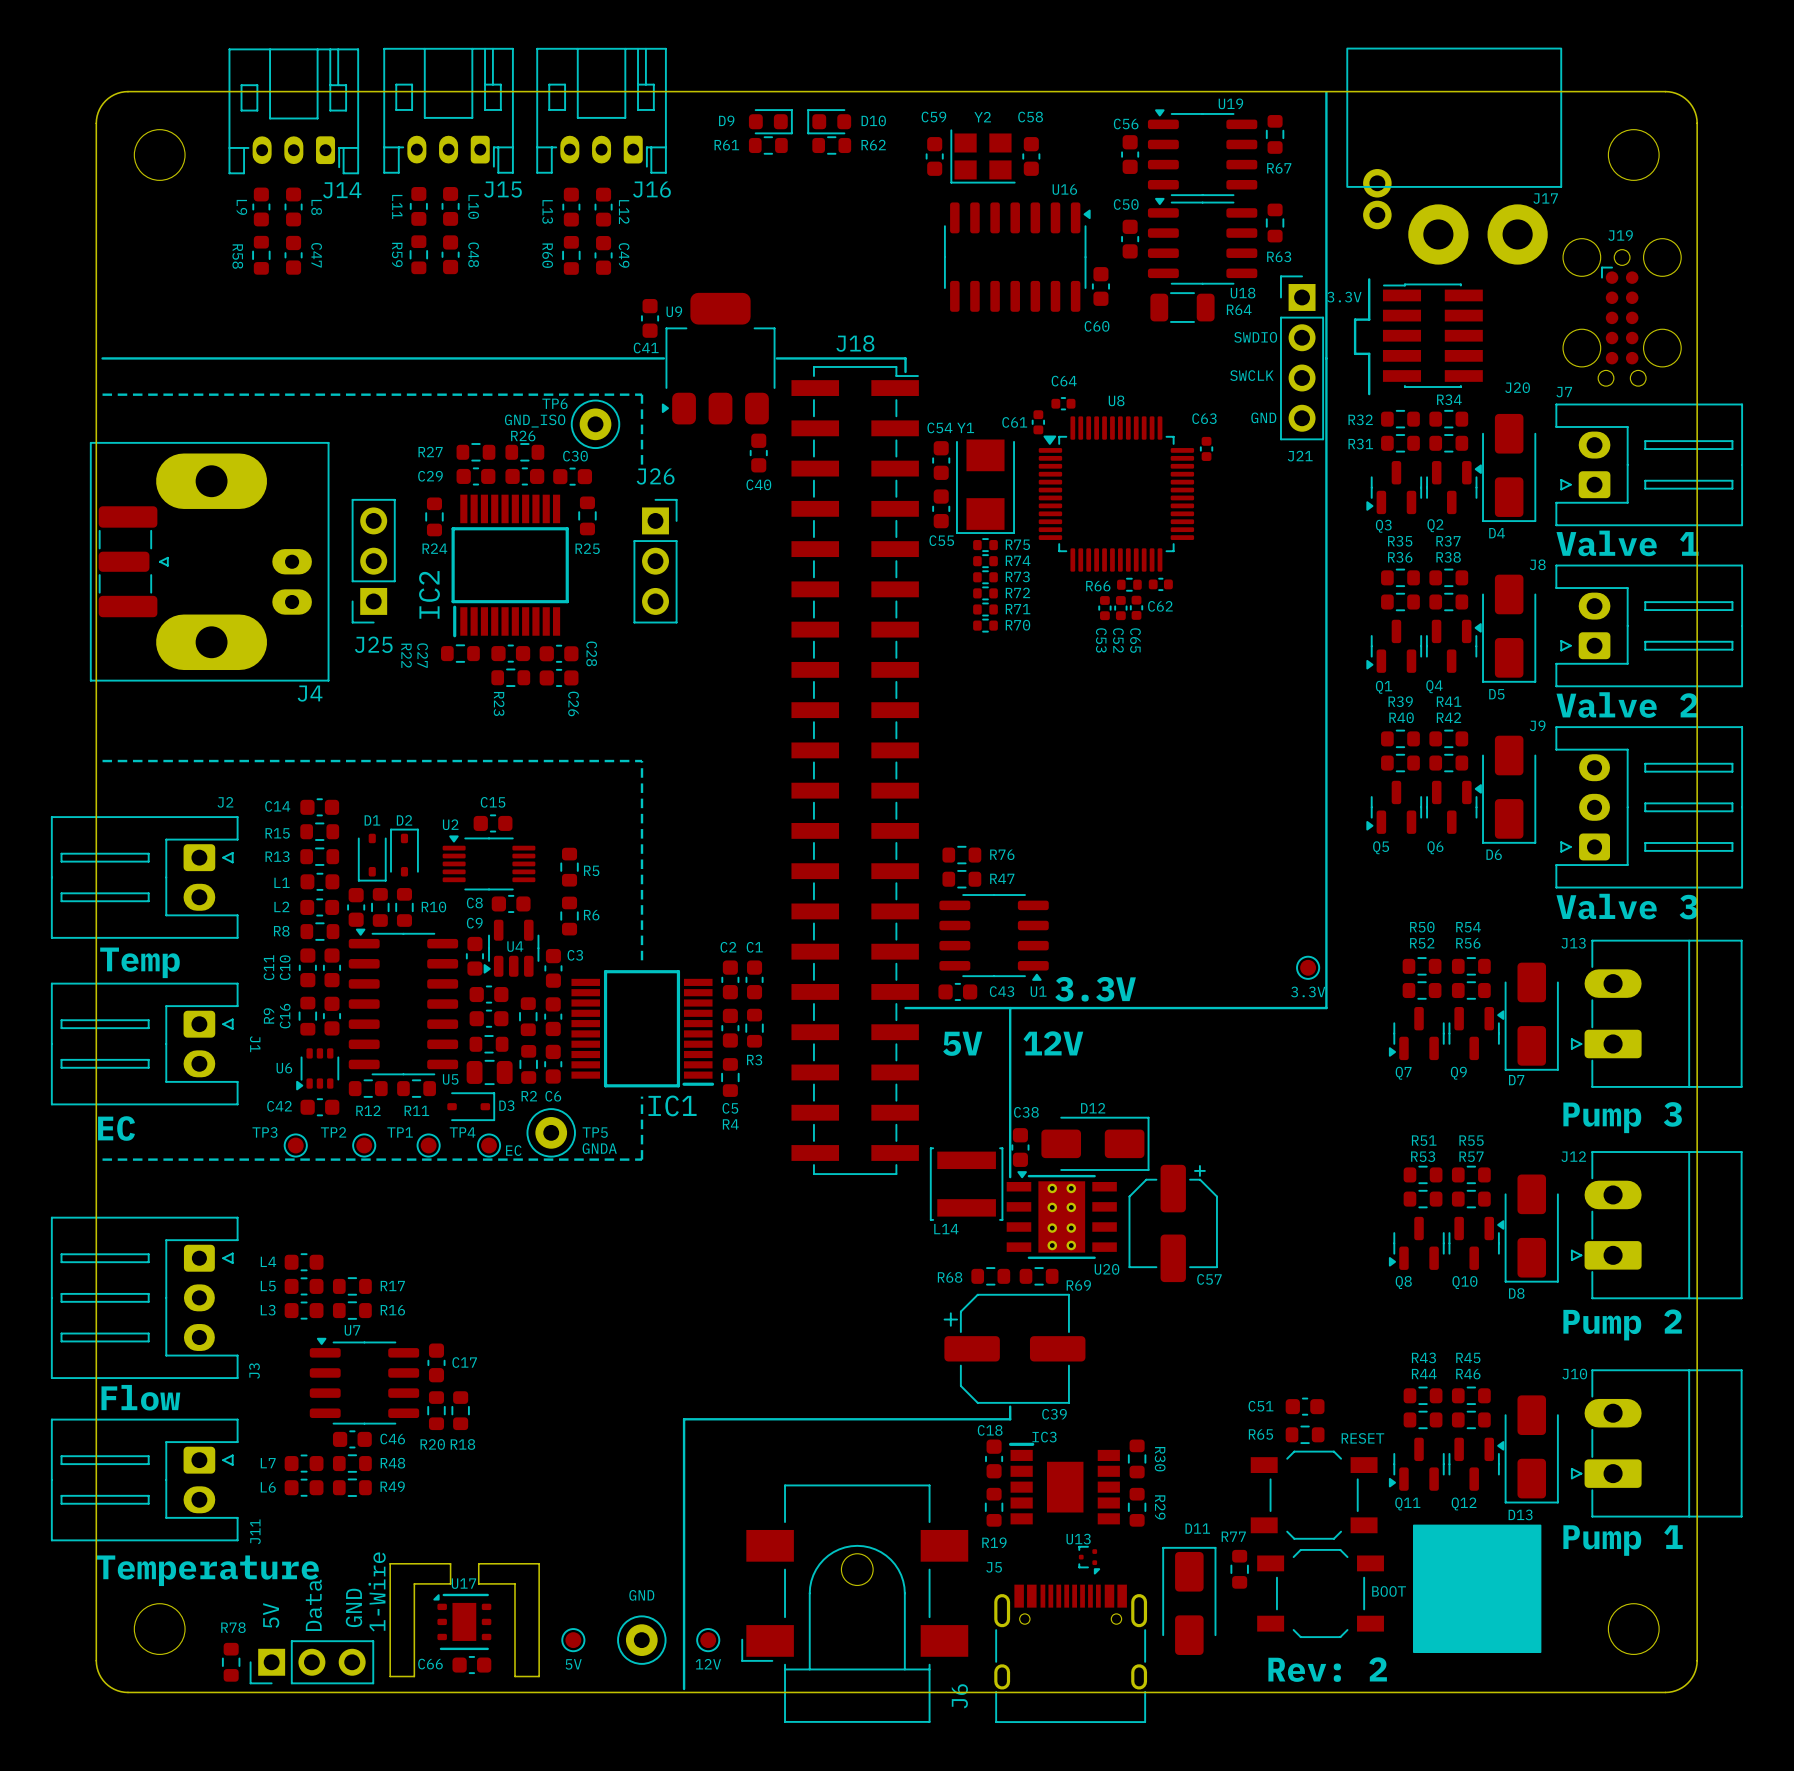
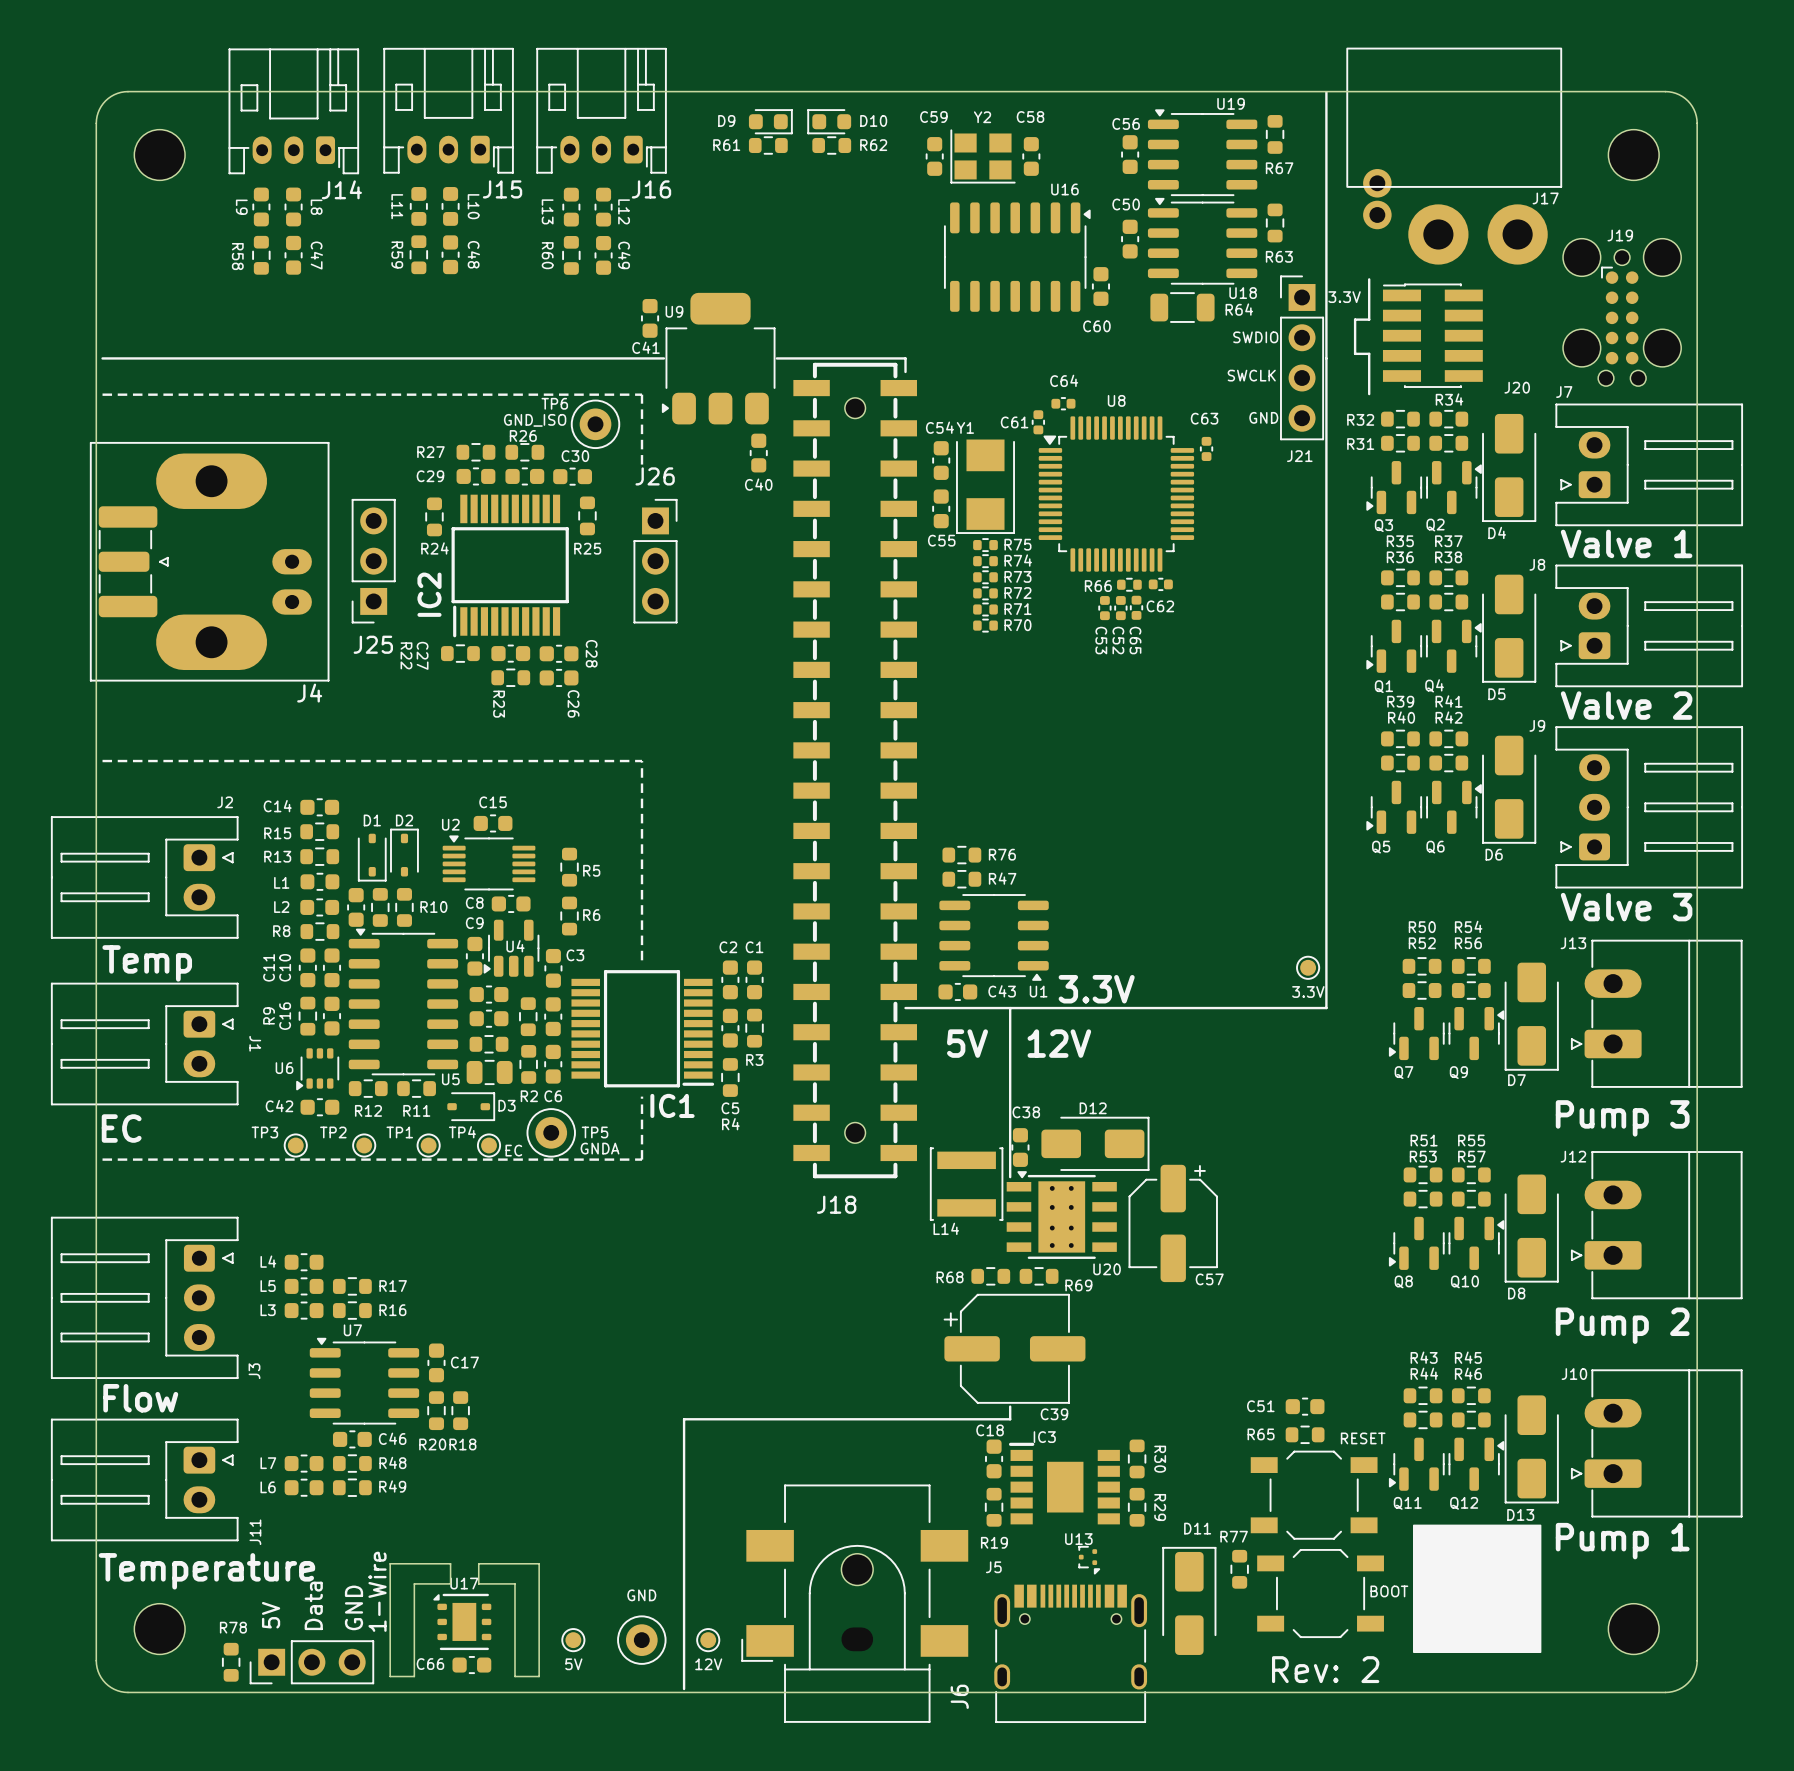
J18 name position: J18 (855, 343) -> J18 (836, 1204)
J18 footprint: [791, 366, 919, 1176] -> [793, 362, 917, 1179]

